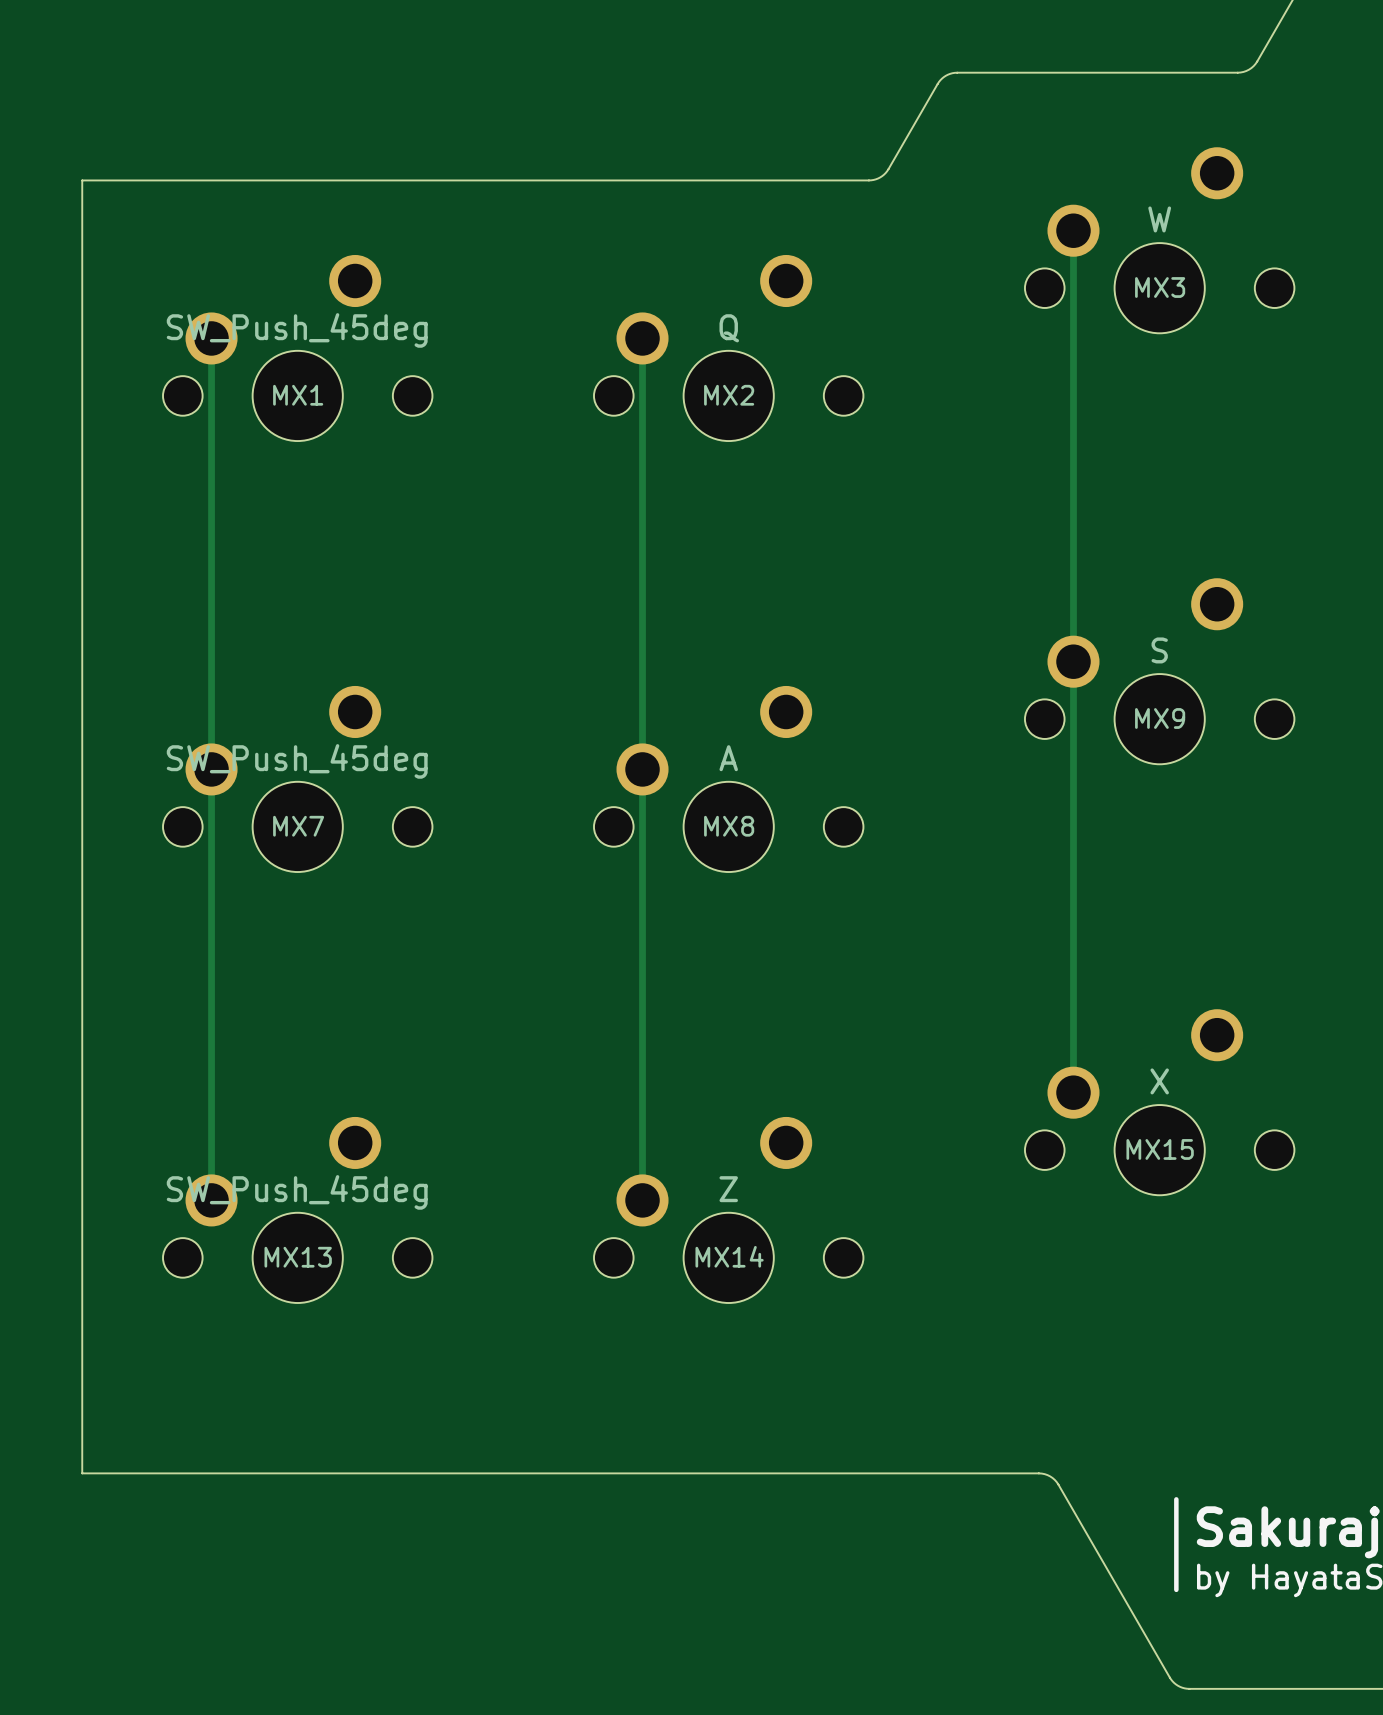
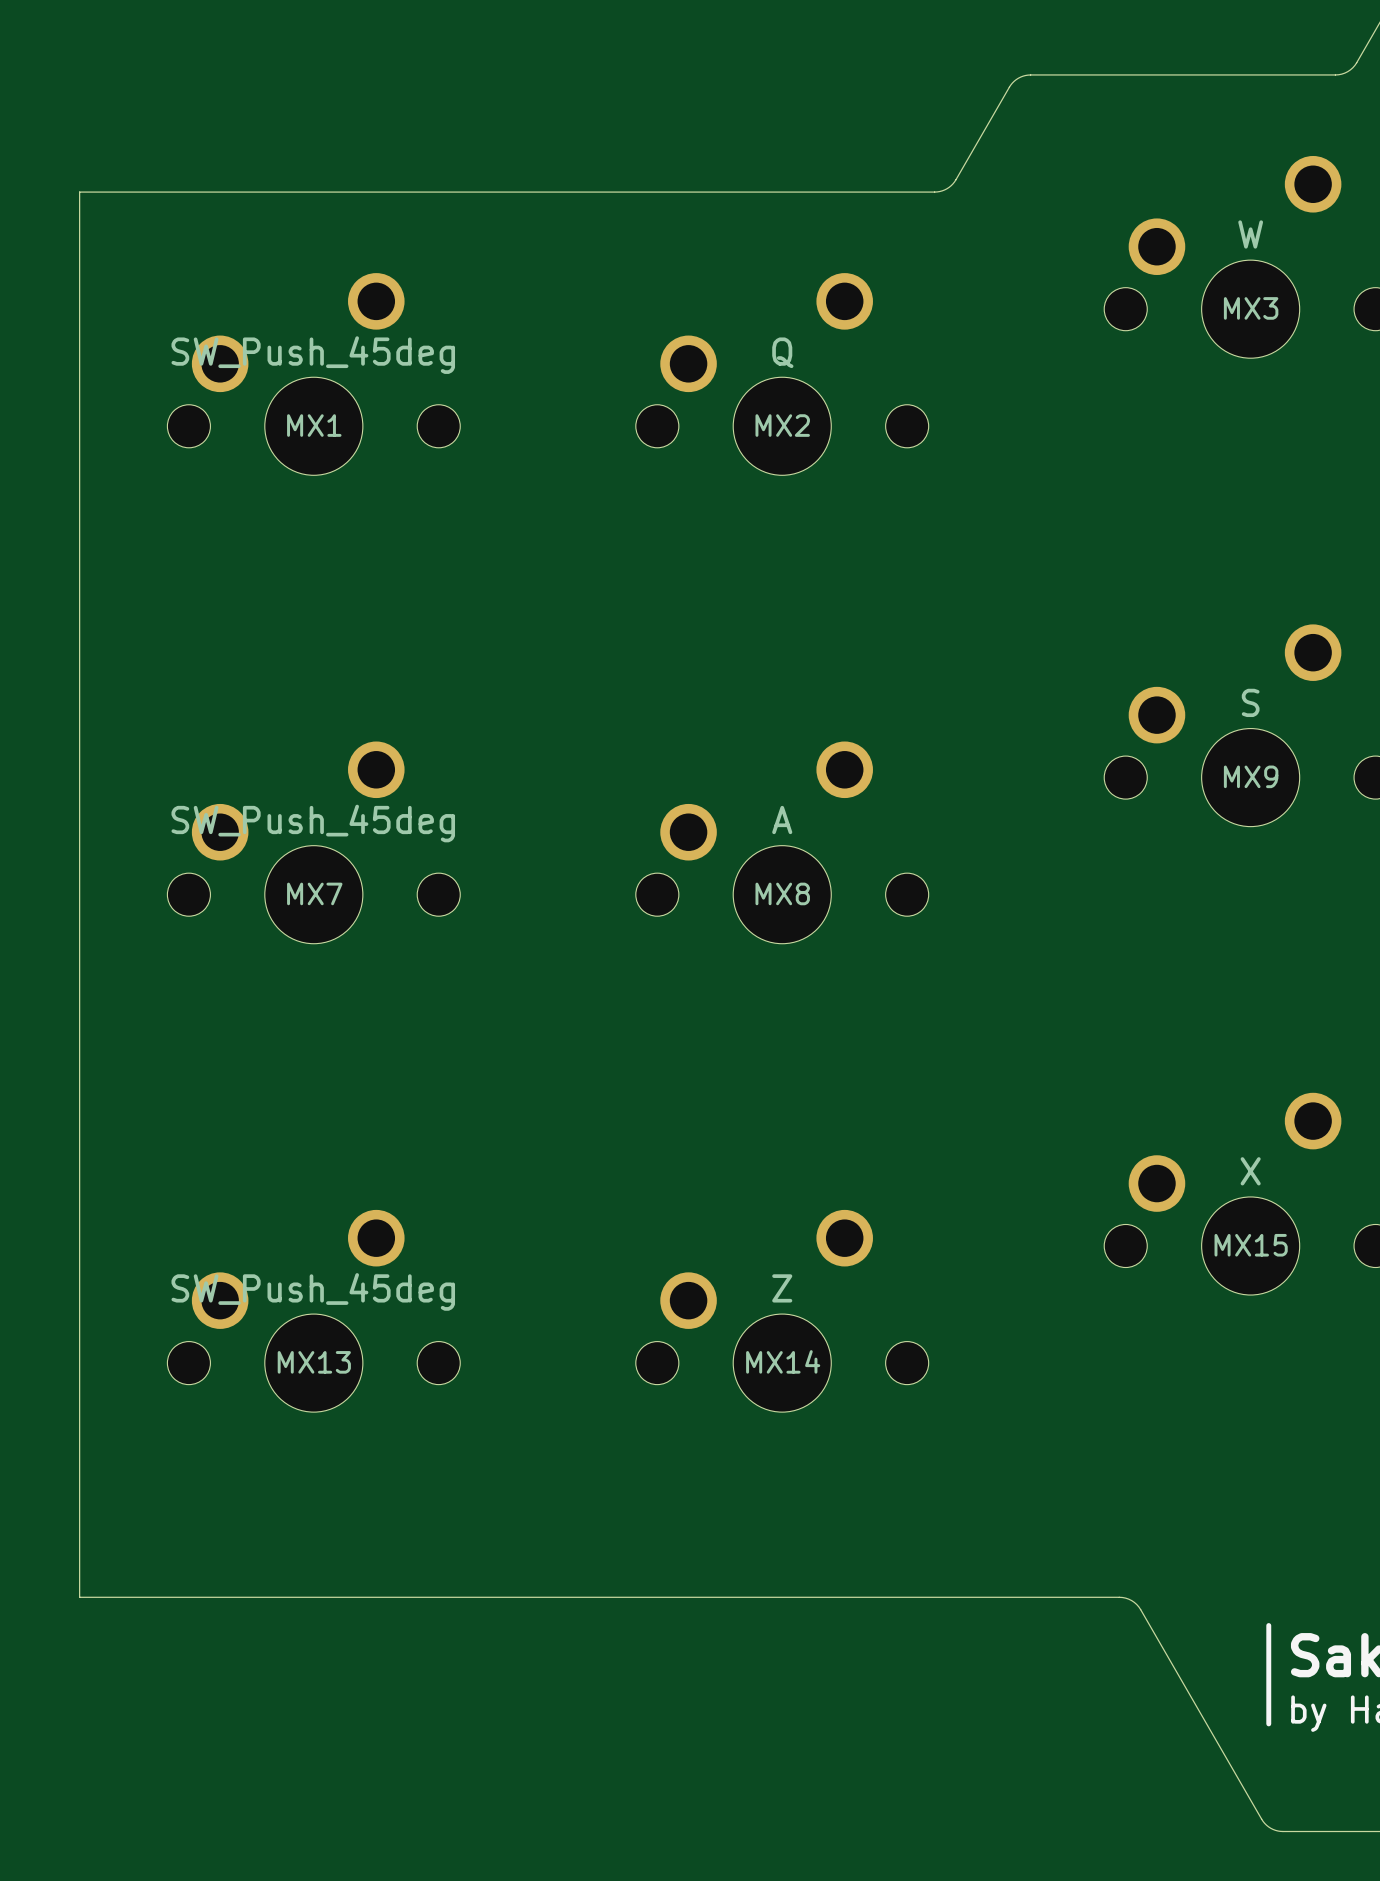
track: (1073, 230) (1073, 1092) -> none
track: (211, 338) (211, 1200) -> none
track: (642, 338) (642, 1200) -> none

